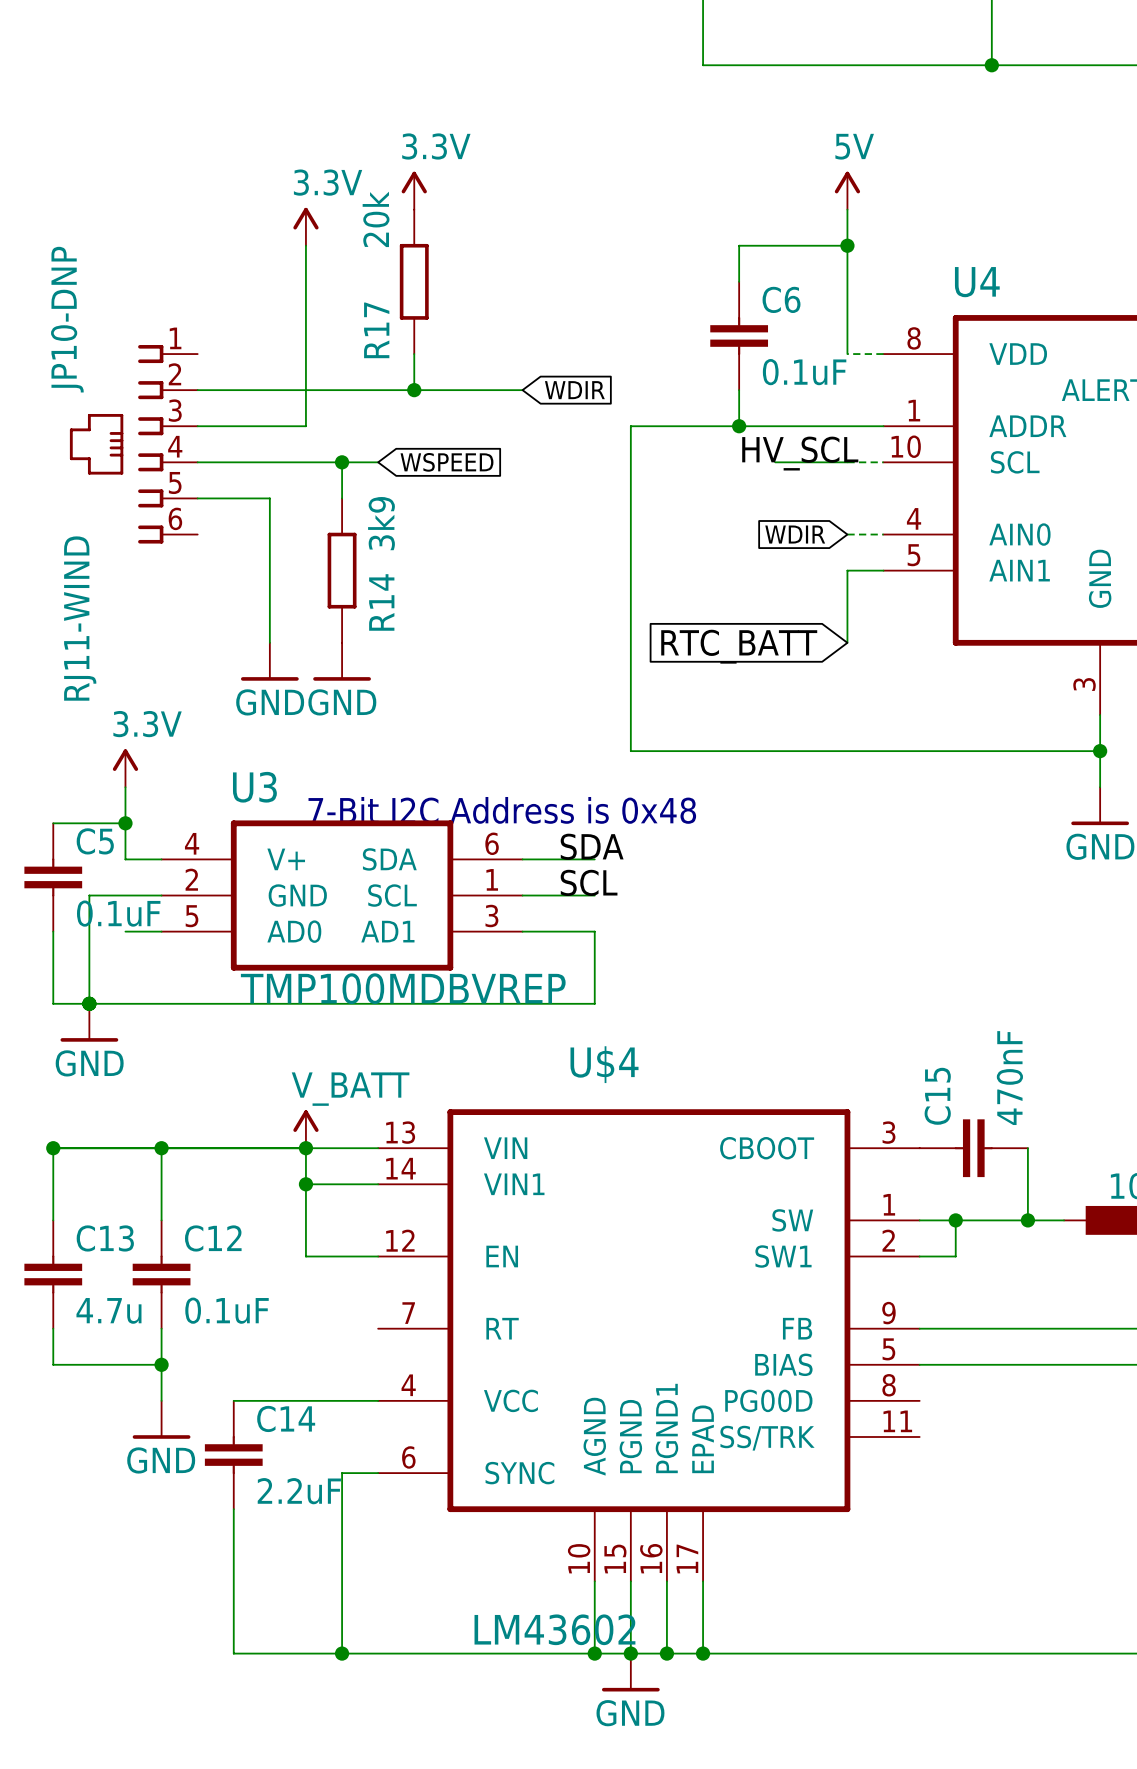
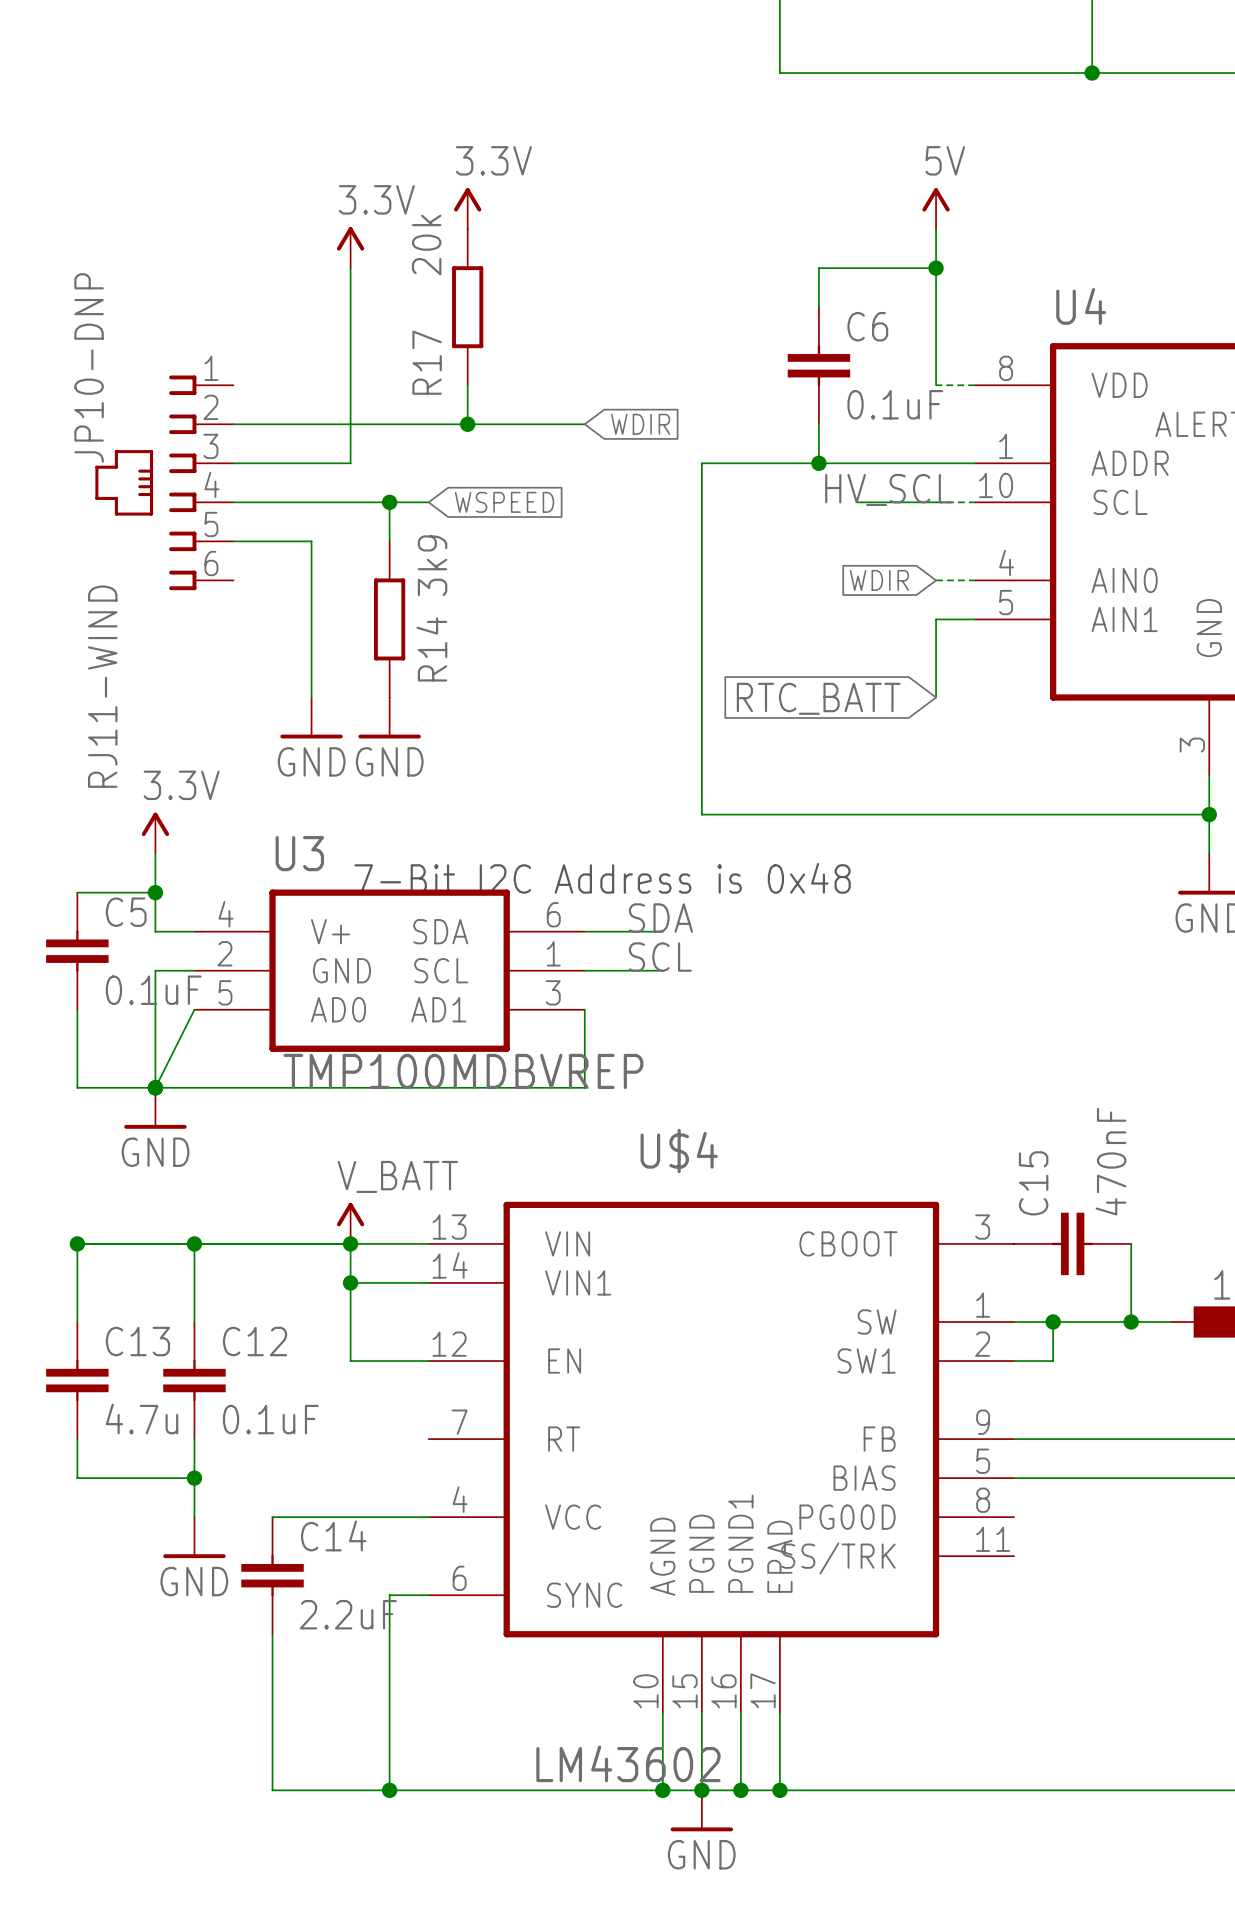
wire: (125, 895) (89, 895) (89, 1003) -> none
wire: (125, 931) (161, 931) -> (155, 970) (155, 1087) (194, 1009)
wire: (522, 931) (594, 931) (594, 1003) (522, 1003) -> (584, 1009) (584, 1087)
junction position: (89, 1003) -> (155, 1087)
power symbol position: GND (89, 1022) -> GND (155, 1108)

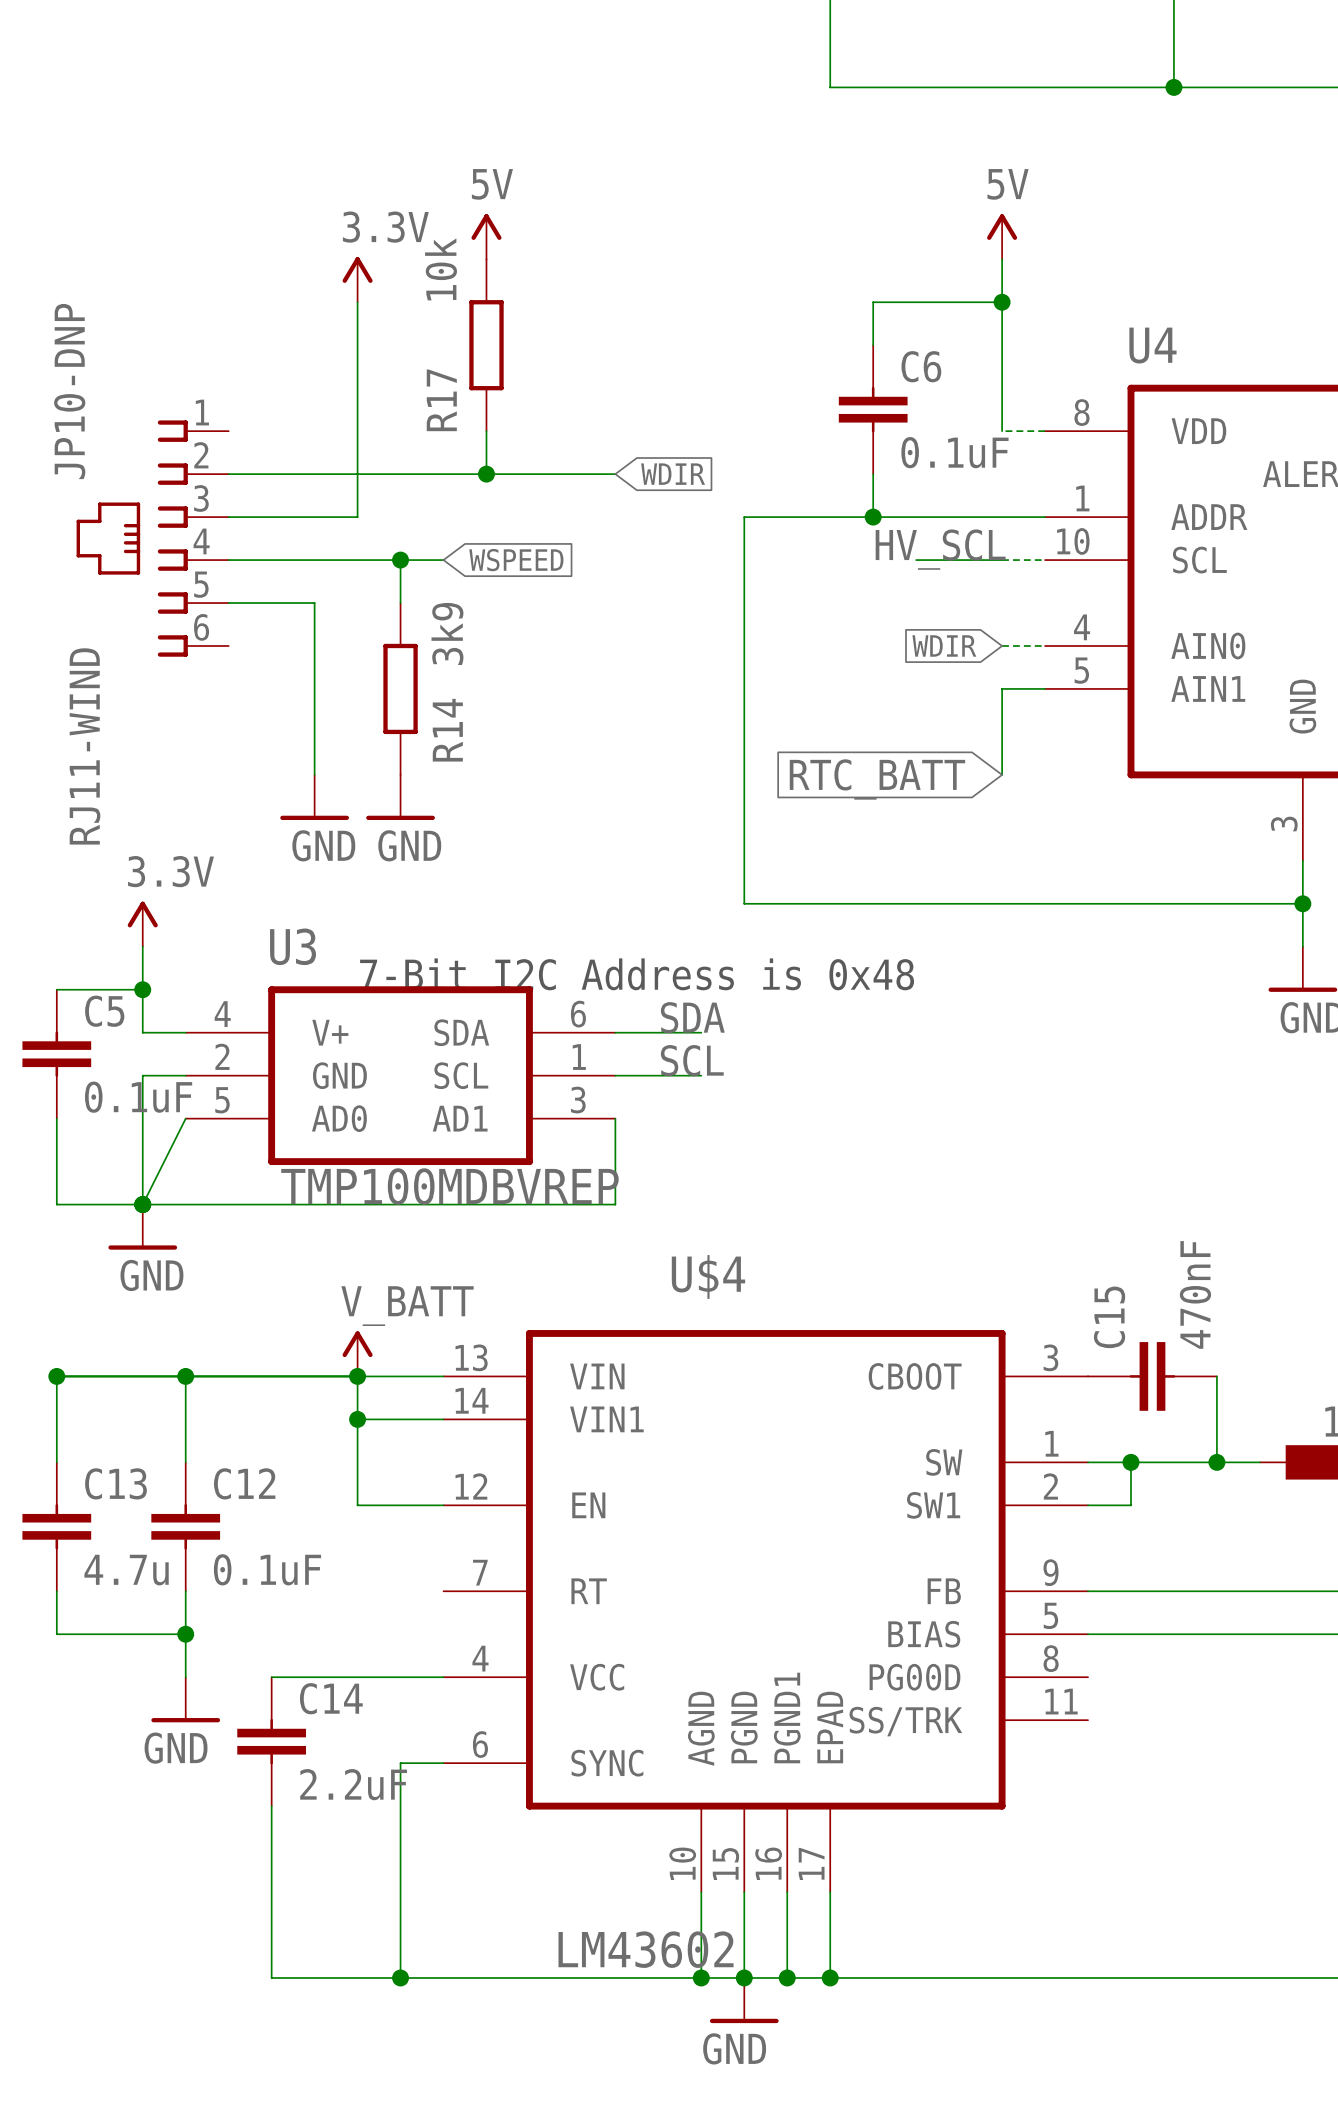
power symbol: 3.3V (467, 208) -> 5V (486, 236)
R17 value: 20k (426, 245) -> 10k (441, 269)

